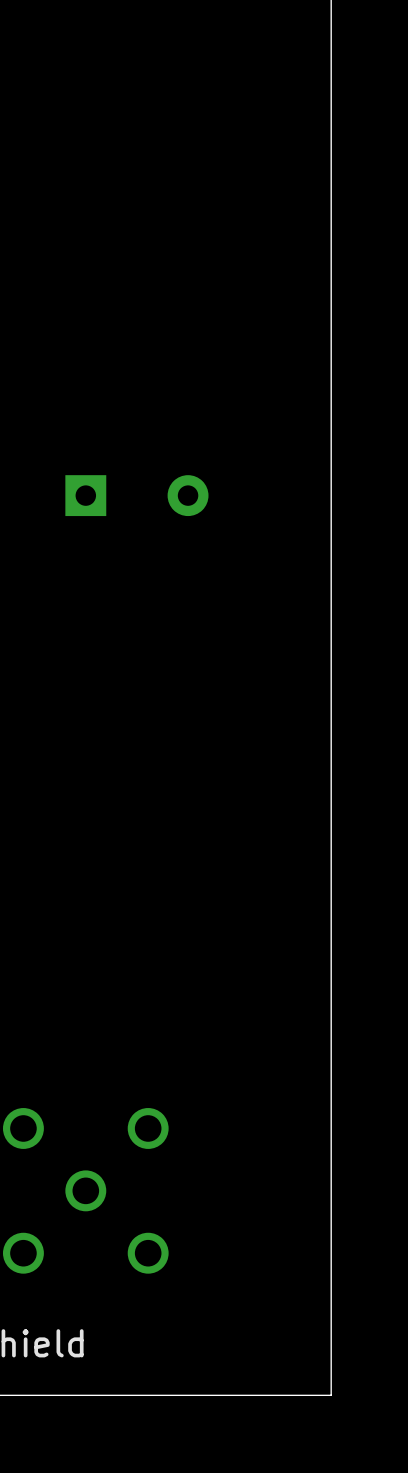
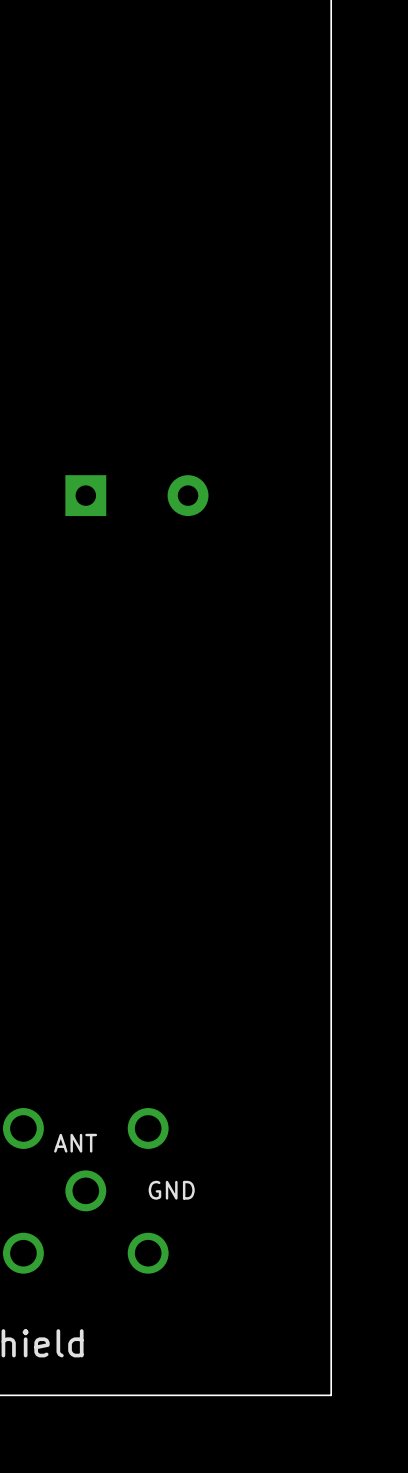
text: none -> ANT (75, 1143)
text: none -> GND (171, 1190)

